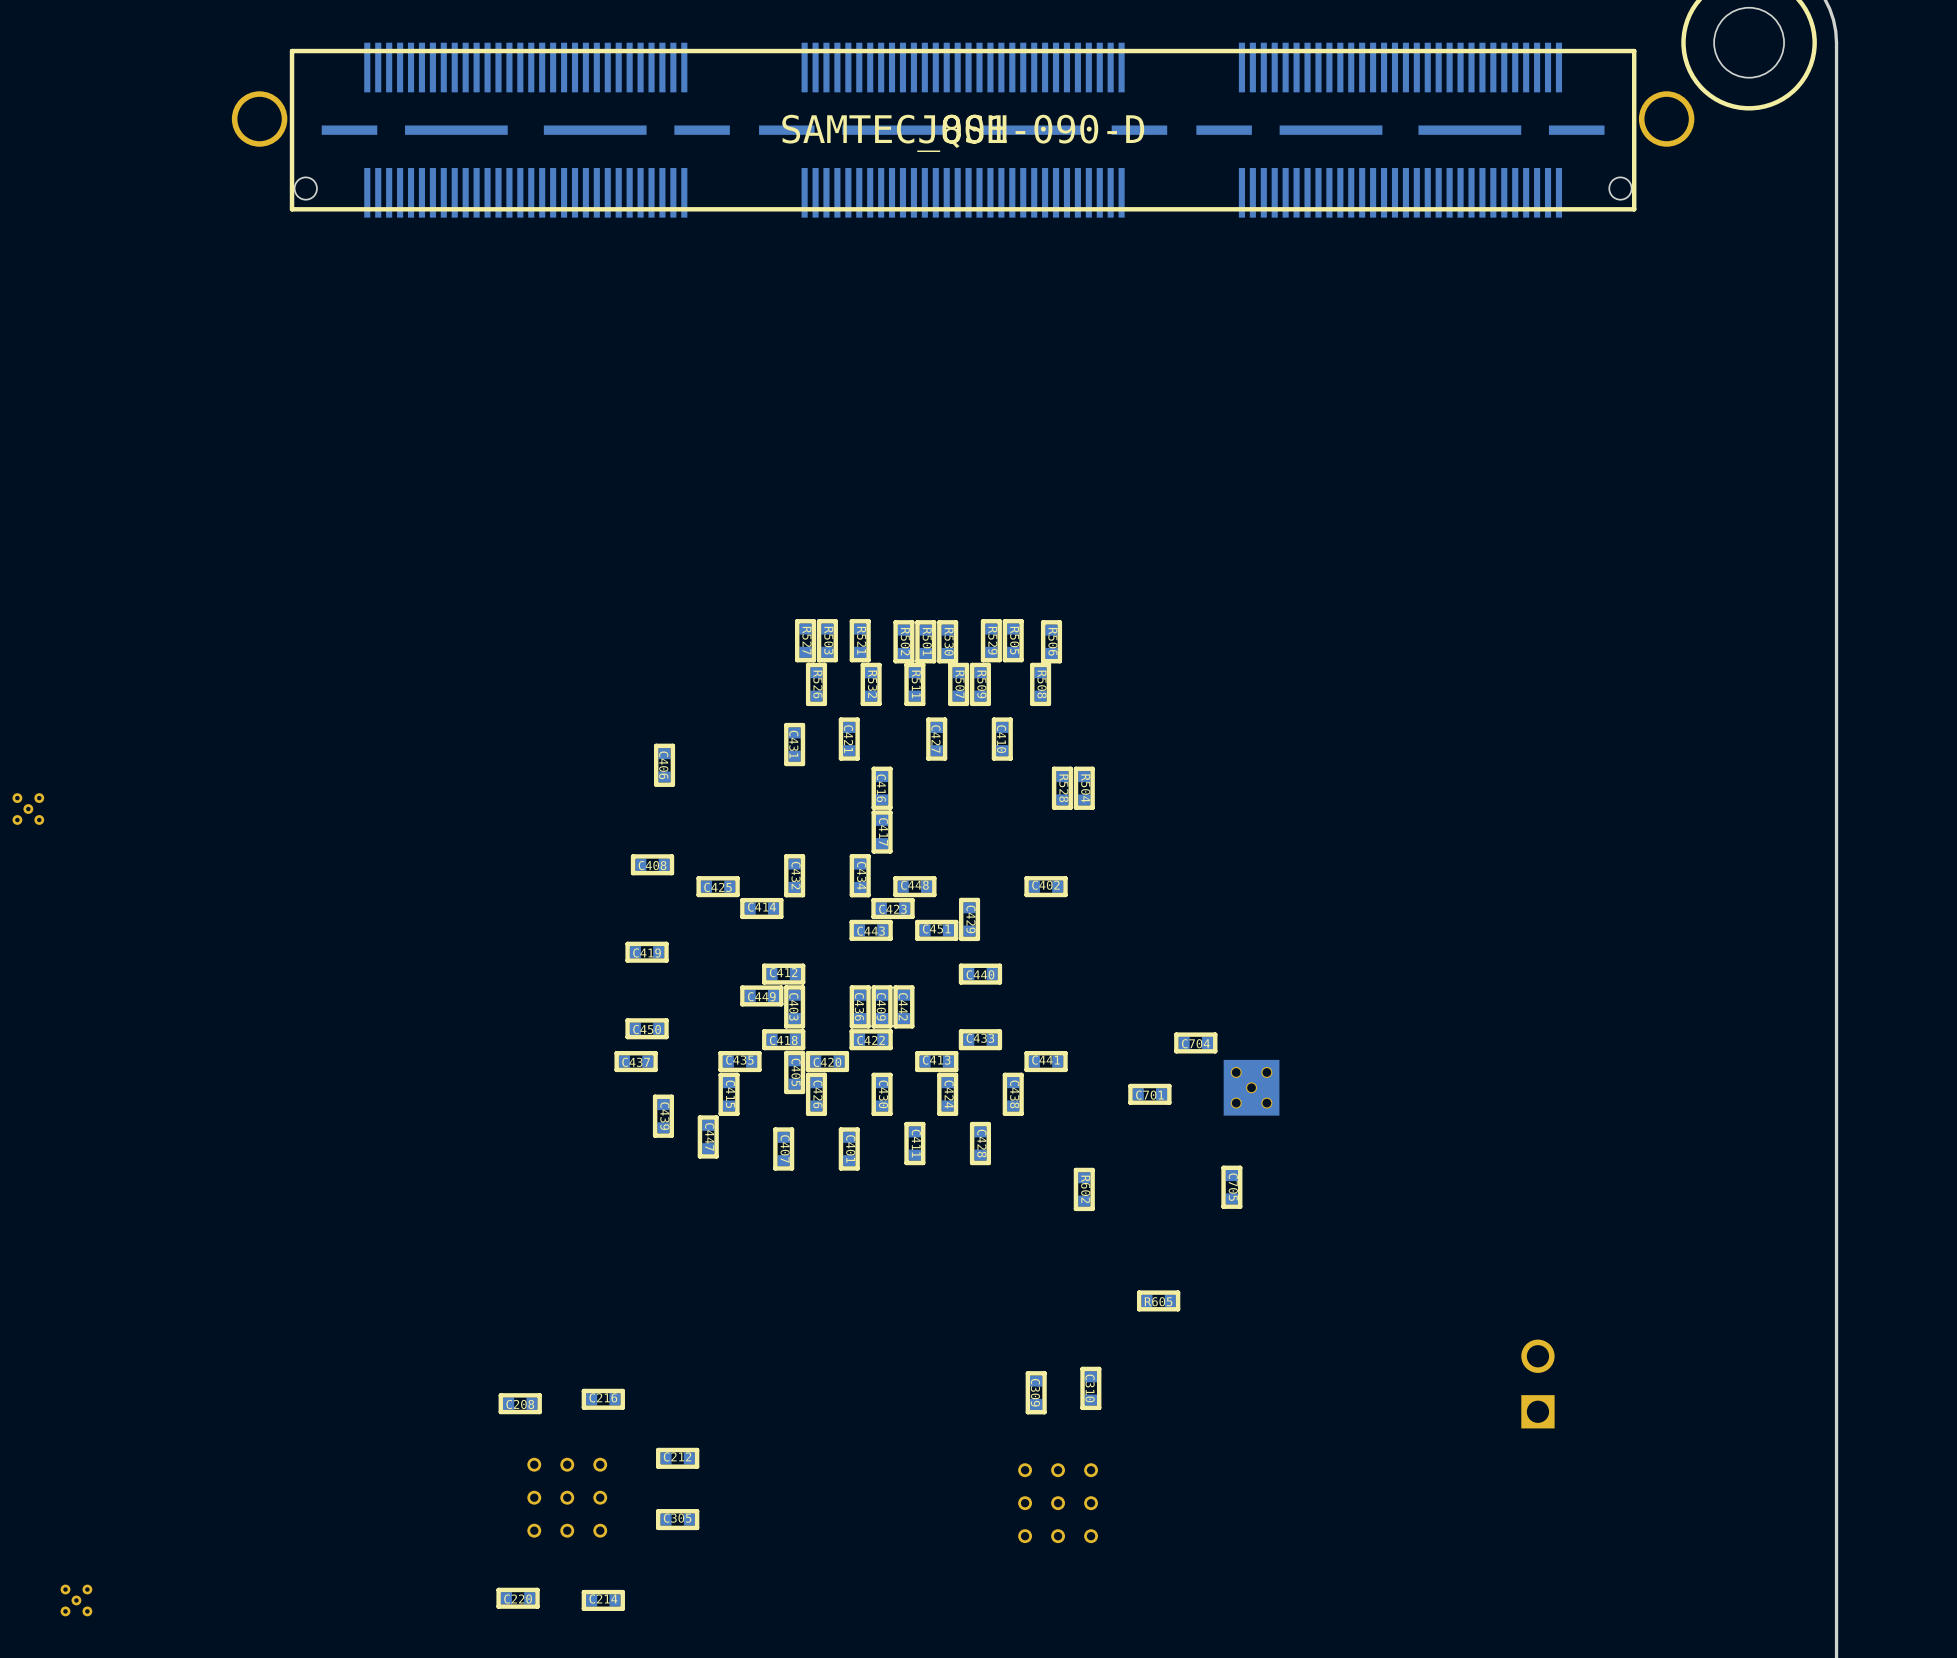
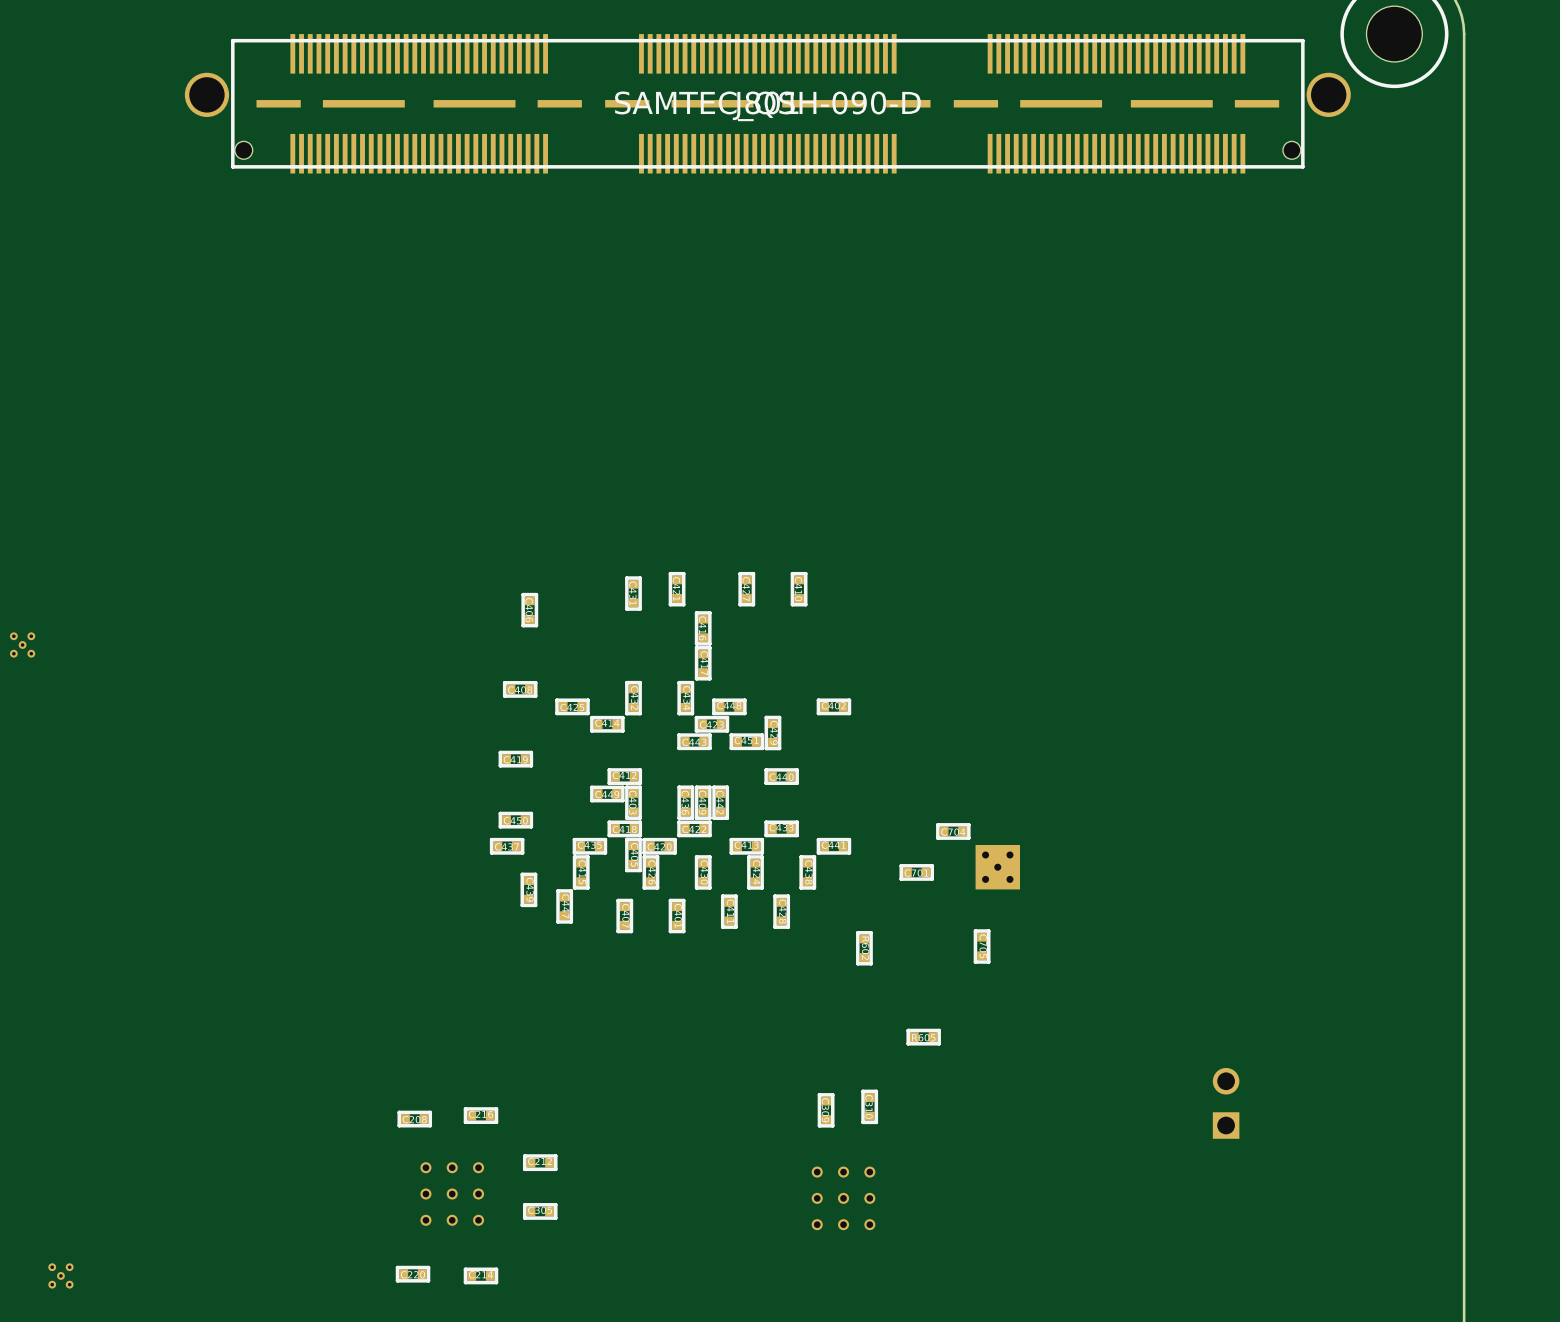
R527: (805, 640) -> none
R503: (827, 640) -> none
R521: (860, 640) -> none
R529: (991, 640) -> none
R505: (1013, 640) -> none
R502: (903, 641) -> none
R501: (925, 641) -> none
R530: (947, 641) -> none
R506: (1051, 641) -> none
R526: (816, 684) -> none
R532: (871, 684) -> none
R511: (914, 684) -> none
R507: (958, 684) -> none
R509: (980, 684) -> none
R508: (1040, 684) -> none
R528: (1062, 788) -> none
R504: (1084, 788) -> none

